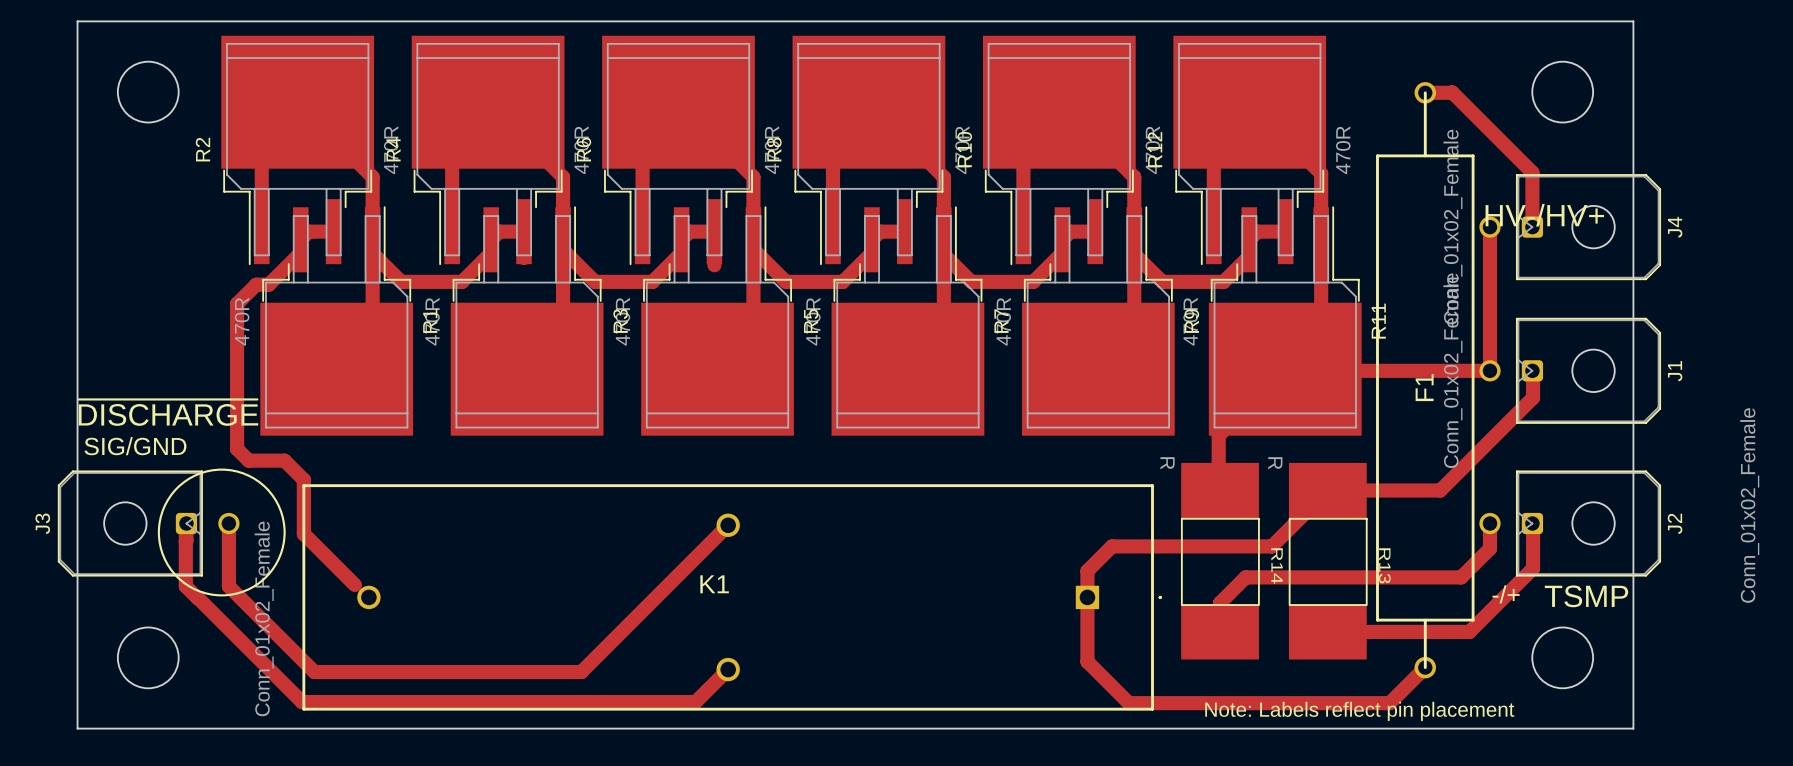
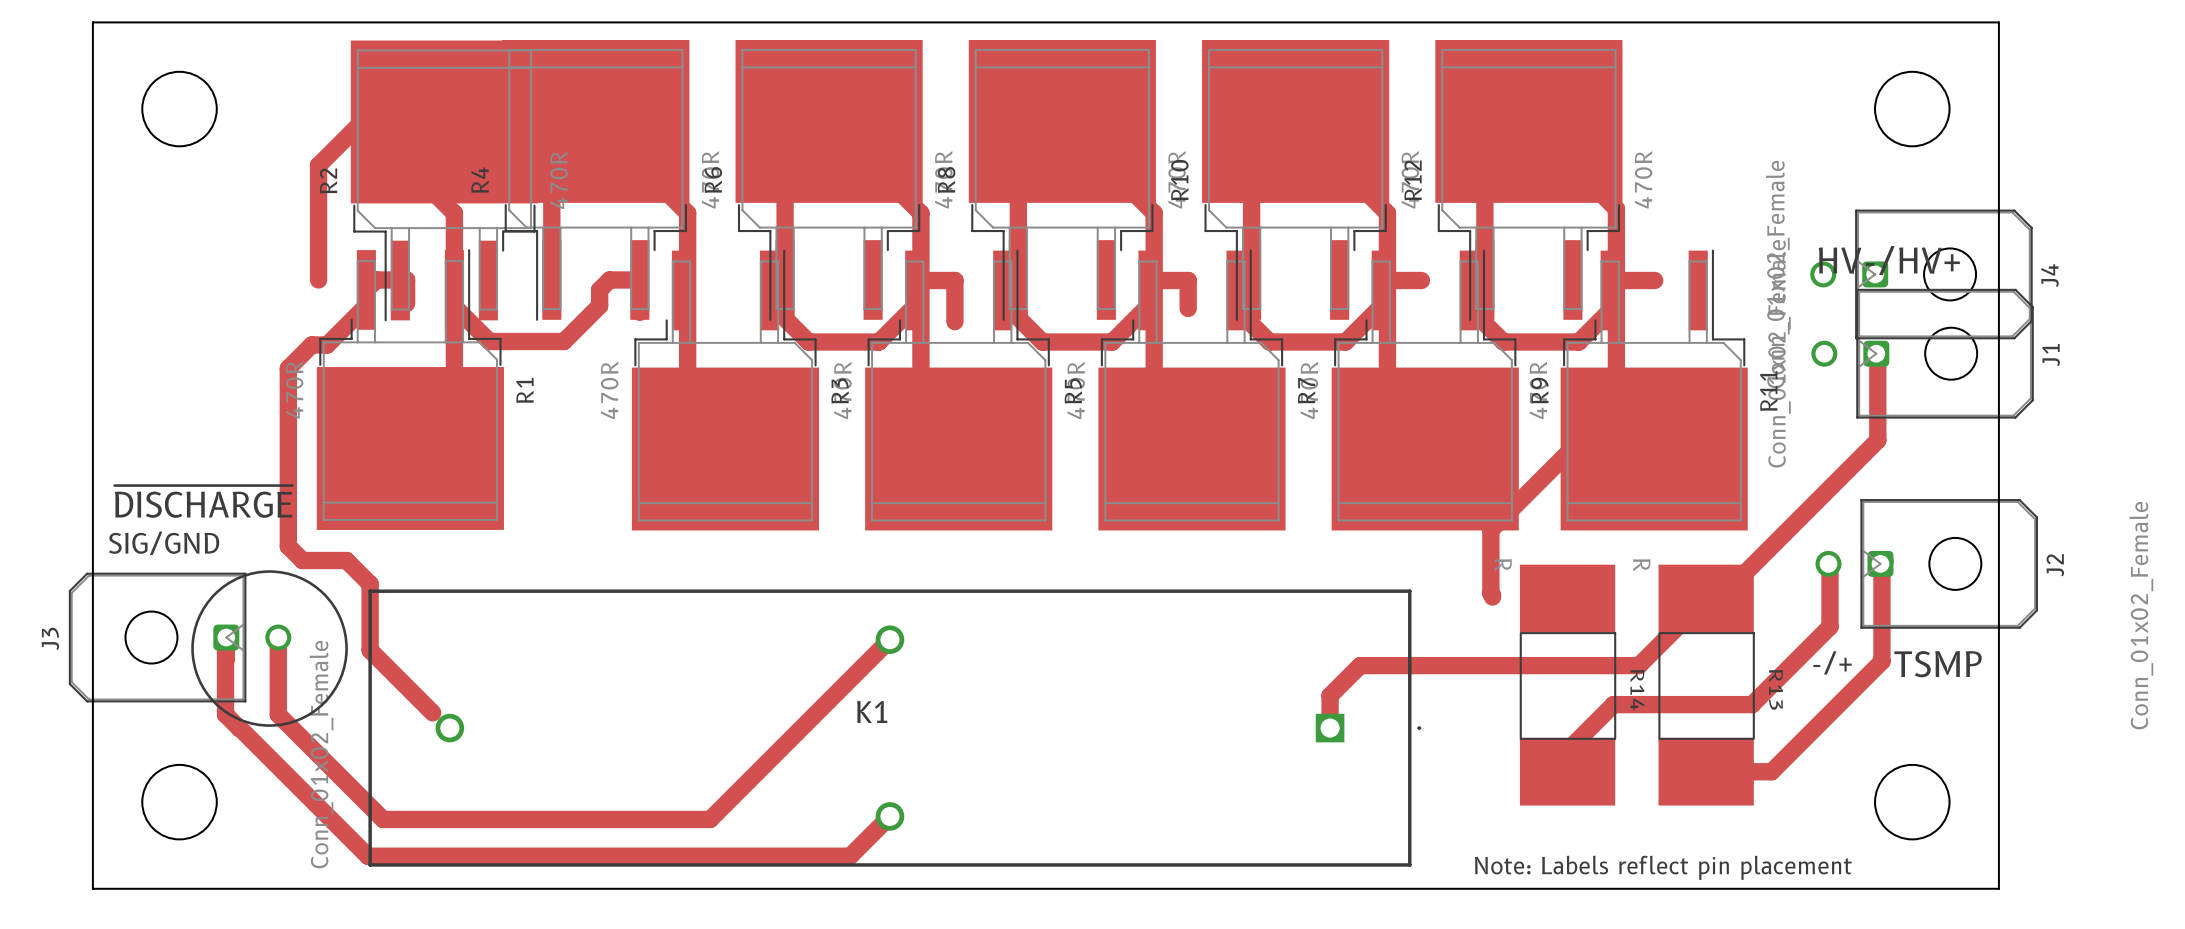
top track: (1425, 92) (1452, 92) (1532, 172) (1532, 227) -> none
R2 position: (297, 150) -> (444, 180)
top track: (1489, 227) (1489, 370) (1286, 370) (1285, 369) -> none
top track: (1095, 231) (1070, 231) (1062, 239) (1062, 252) (1033, 281) (971, 281) (943, 254) -> (1421, 280) (1391, 280) (1381, 290) (1381, 306) (1345, 342) (1269, 342) (1235, 308)
top track: (1285, 231) (1257, 231) (1249, 239) (1249, 256) (1223, 281) (1162, 281) (1134, 253) -> (1654, 280) (1620, 280) (1610, 290) (1610, 310) (1578, 342) (1503, 342) (1469, 307)
top track: (563, 249) (594, 281) (652, 281) (681, 252) (681, 239) (689, 231) (714, 231) (714, 265) -> (769, 302) (808, 342) (879, 342) (914, 306) (914, 290) (924, 280) (954, 280) (954, 321)
top track: (753, 249) (785, 281) (842, 281) (872, 252) (872, 239) (880, 231) (904, 231) (904, 254) -> (1002, 302) (1042, 342) (1112, 342) (1147, 306) (1147, 290) (1157, 280) (1188, 280) (1188, 308)
R3 position: (527, 321) -> (725, 390)
R5 position: (717, 321) -> (958, 390)
R7 position: (907, 321) -> (1191, 390)
R9 position: (1098, 321) -> (1425, 390)
R11 position: (1285, 321) -> (1654, 390)
top track: (1532, 370) (1533, 397) (1440, 490) (1327, 490) (1271, 546) -> (1876, 353) (1877, 440) (1719, 598) (1706, 598) (1639, 665) (1556, 665)
J1 position: (1570, 370) -> (1922, 353)
F1: (1425, 380) -> none
top track: none -> (1884, 561) (1881, 564) (1881, 661) (1771, 771) (1706, 771)
top track: none -> (1829, 564) (1829, 626) (1752, 704) (1613, 704) (1567, 750) (1567, 771)
top track: (1489, 523) (1489, 548) (1461, 577) (1245, 577) (1220, 603) (1220, 631) -> none
top track: (1532, 523) (1533, 568) (1469, 631) (1327, 631) -> none
J2 position: (1570, 523) -> (1926, 563)
R14 position: (1220, 561) -> (1567, 685)
R13 position: (1328, 561) -> (1706, 685)
text position: -/+ (1506, 594) -> -/+ (1832, 662)
text position: TSMP (1586, 596) -> TSMP (1938, 664)
top track: (1087, 597) (1087, 661) (1128, 703) (1389, 703) (1425, 667) -> none

